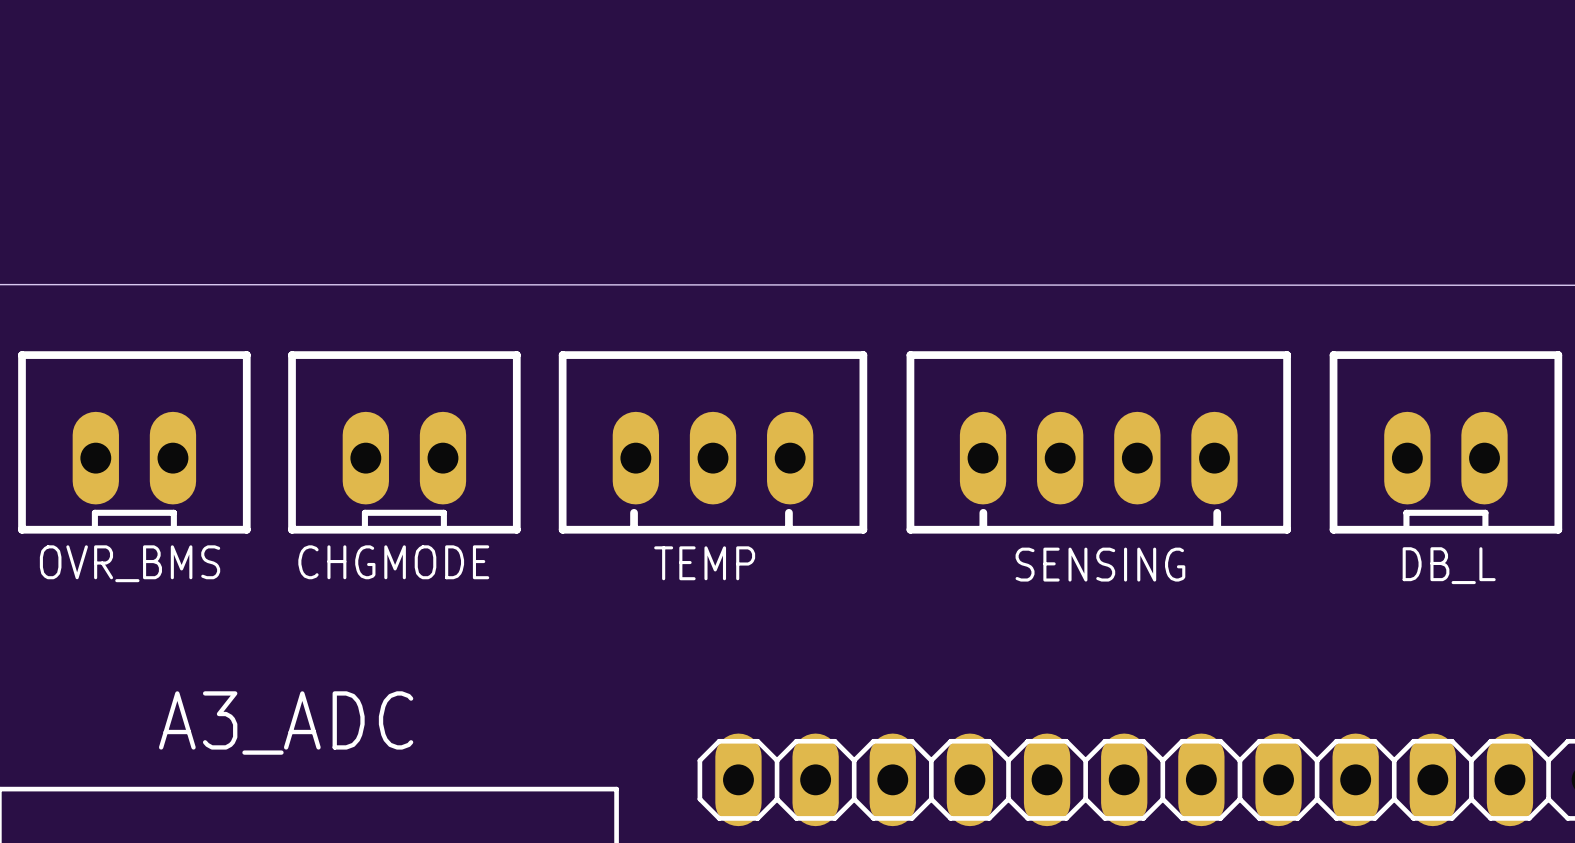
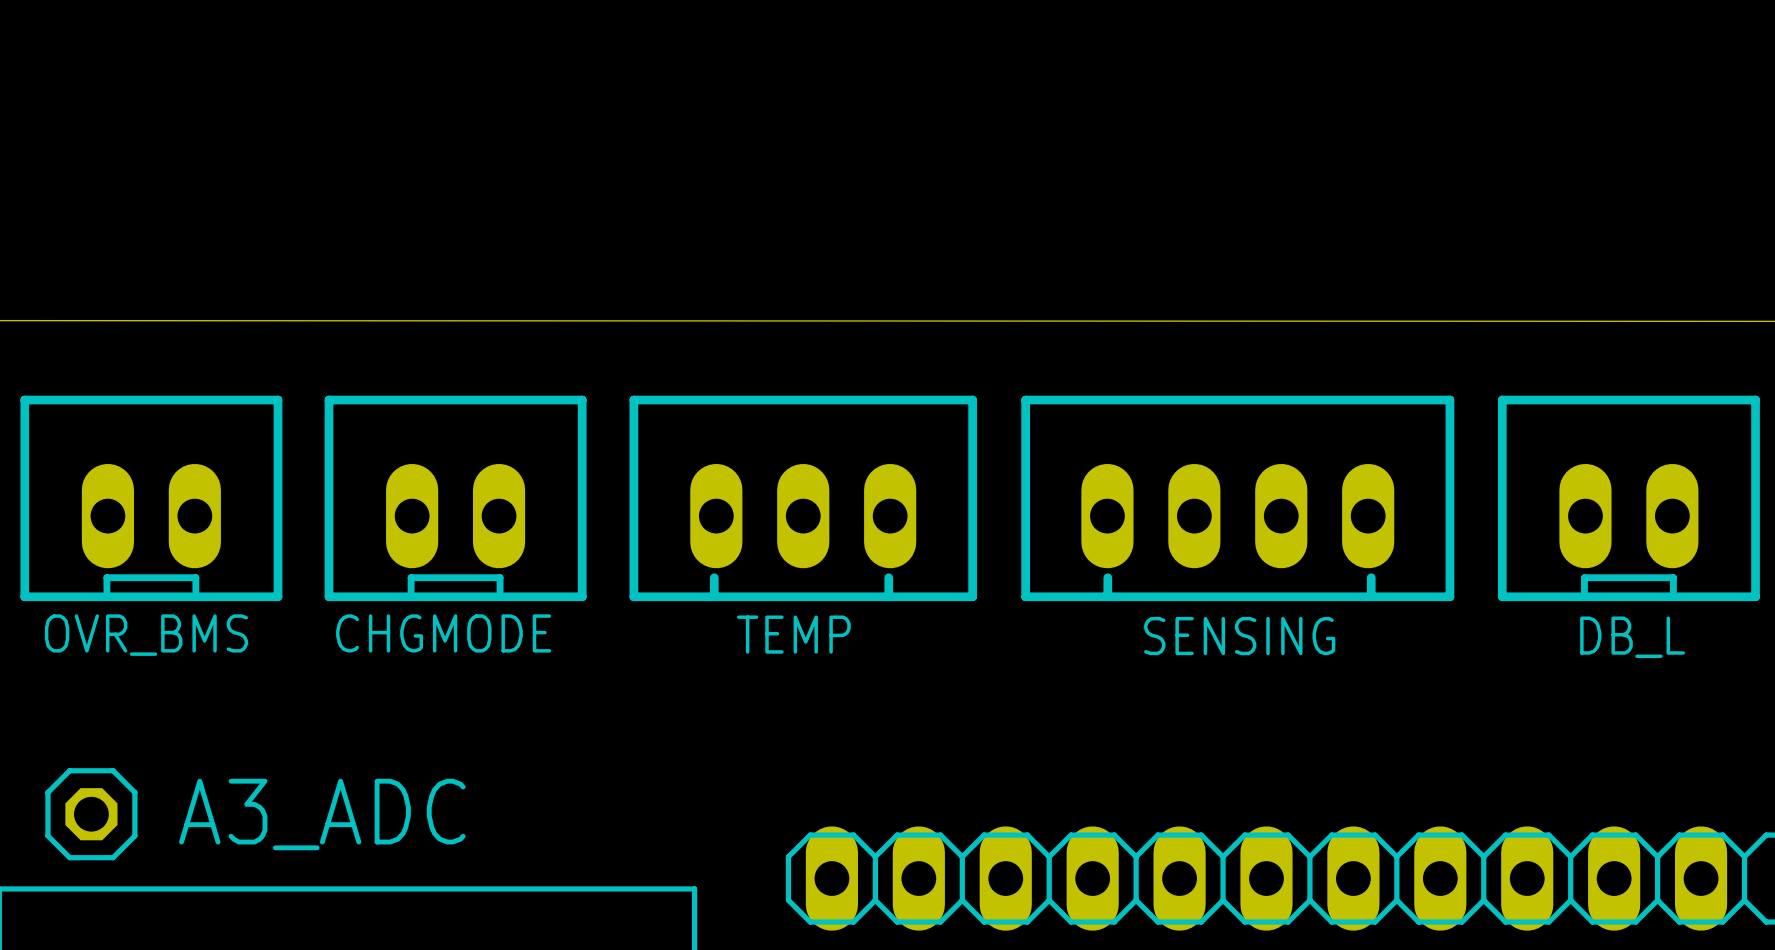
part: none -> (91, 814)

